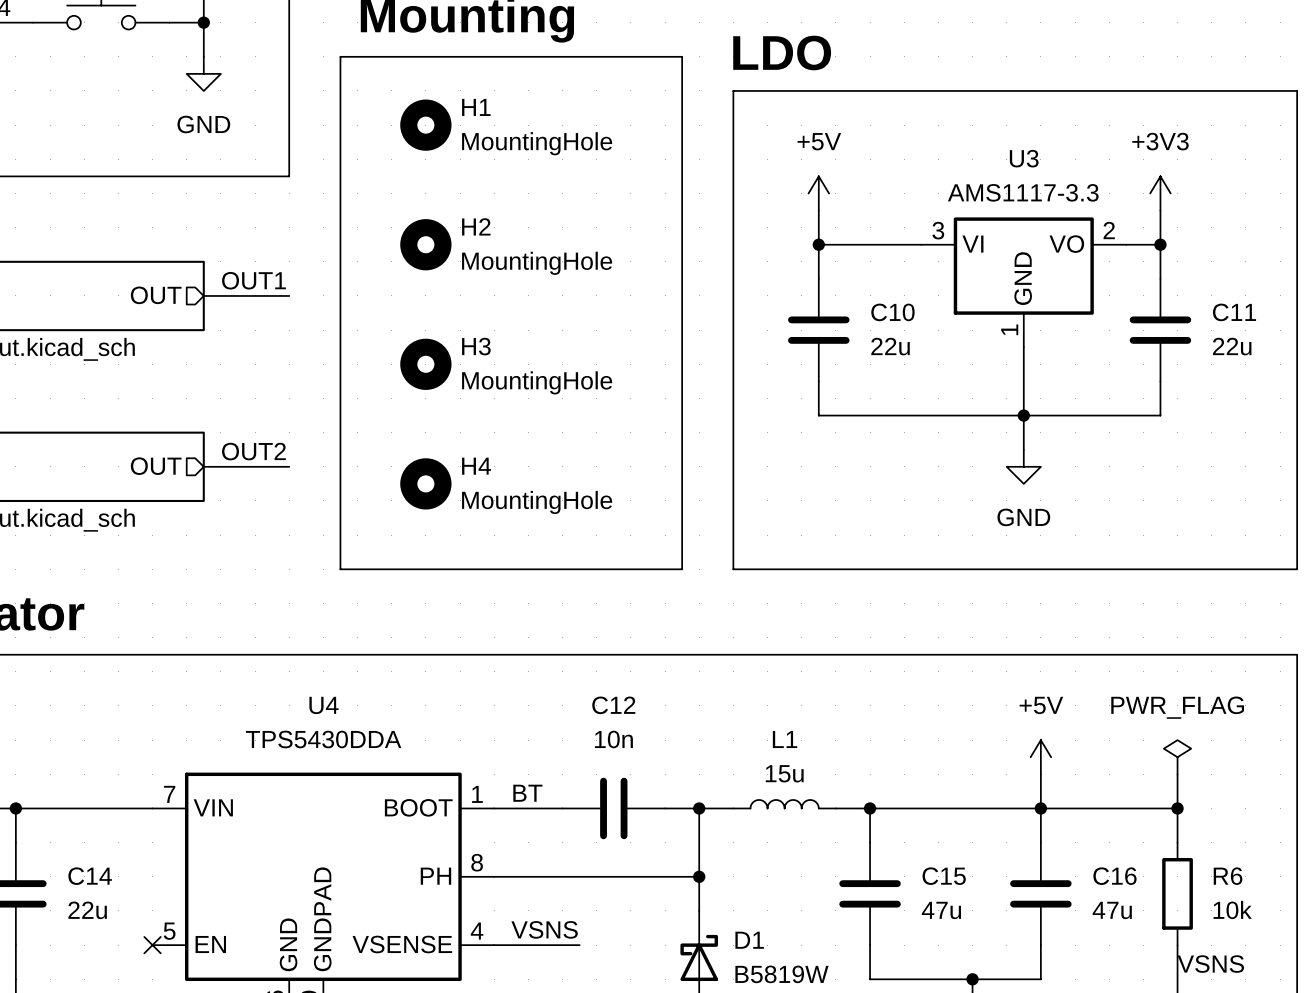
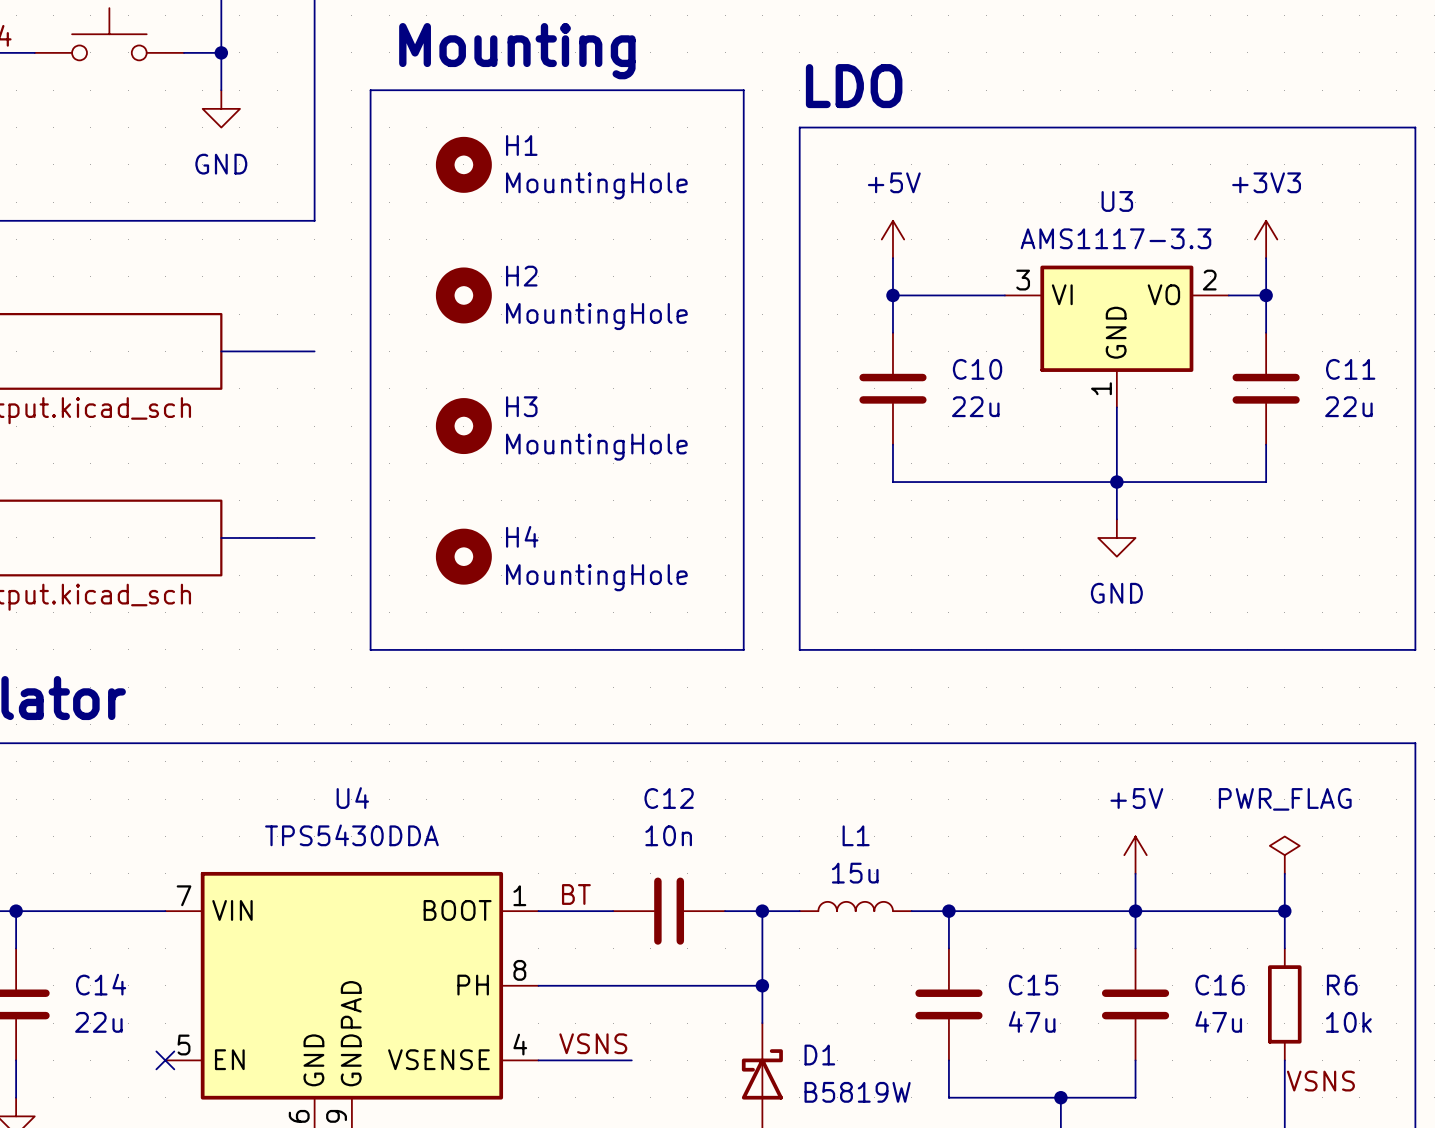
label: OUT1 (253, 280) -> none
sheet pin: OUT (156, 295) -> none
label: OUT2 (253, 451) -> none
sheet pin: OUT (156, 466) -> none

